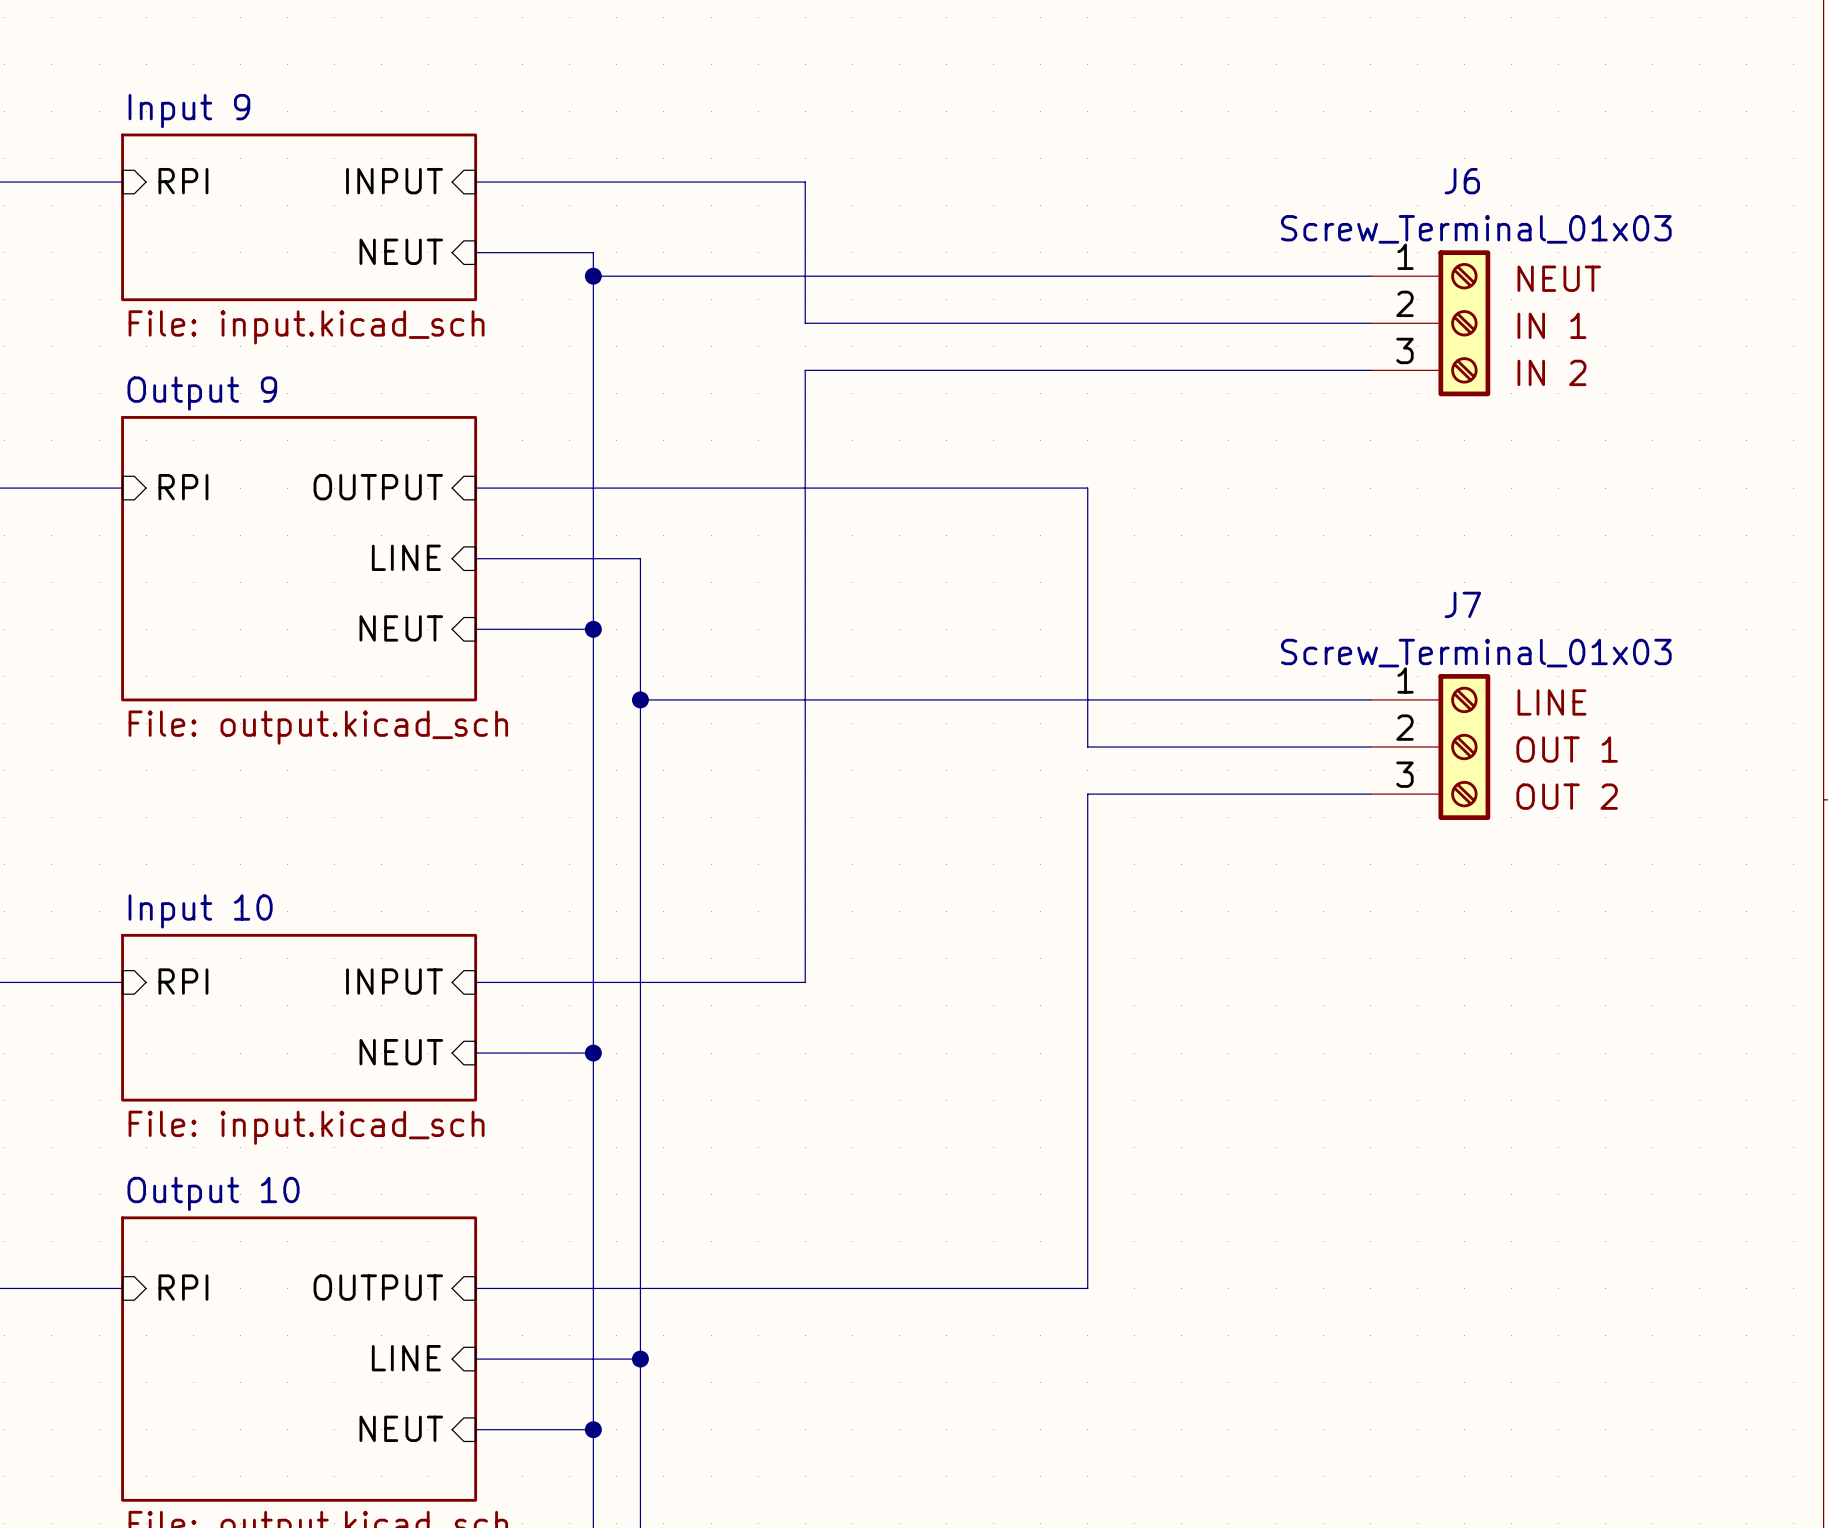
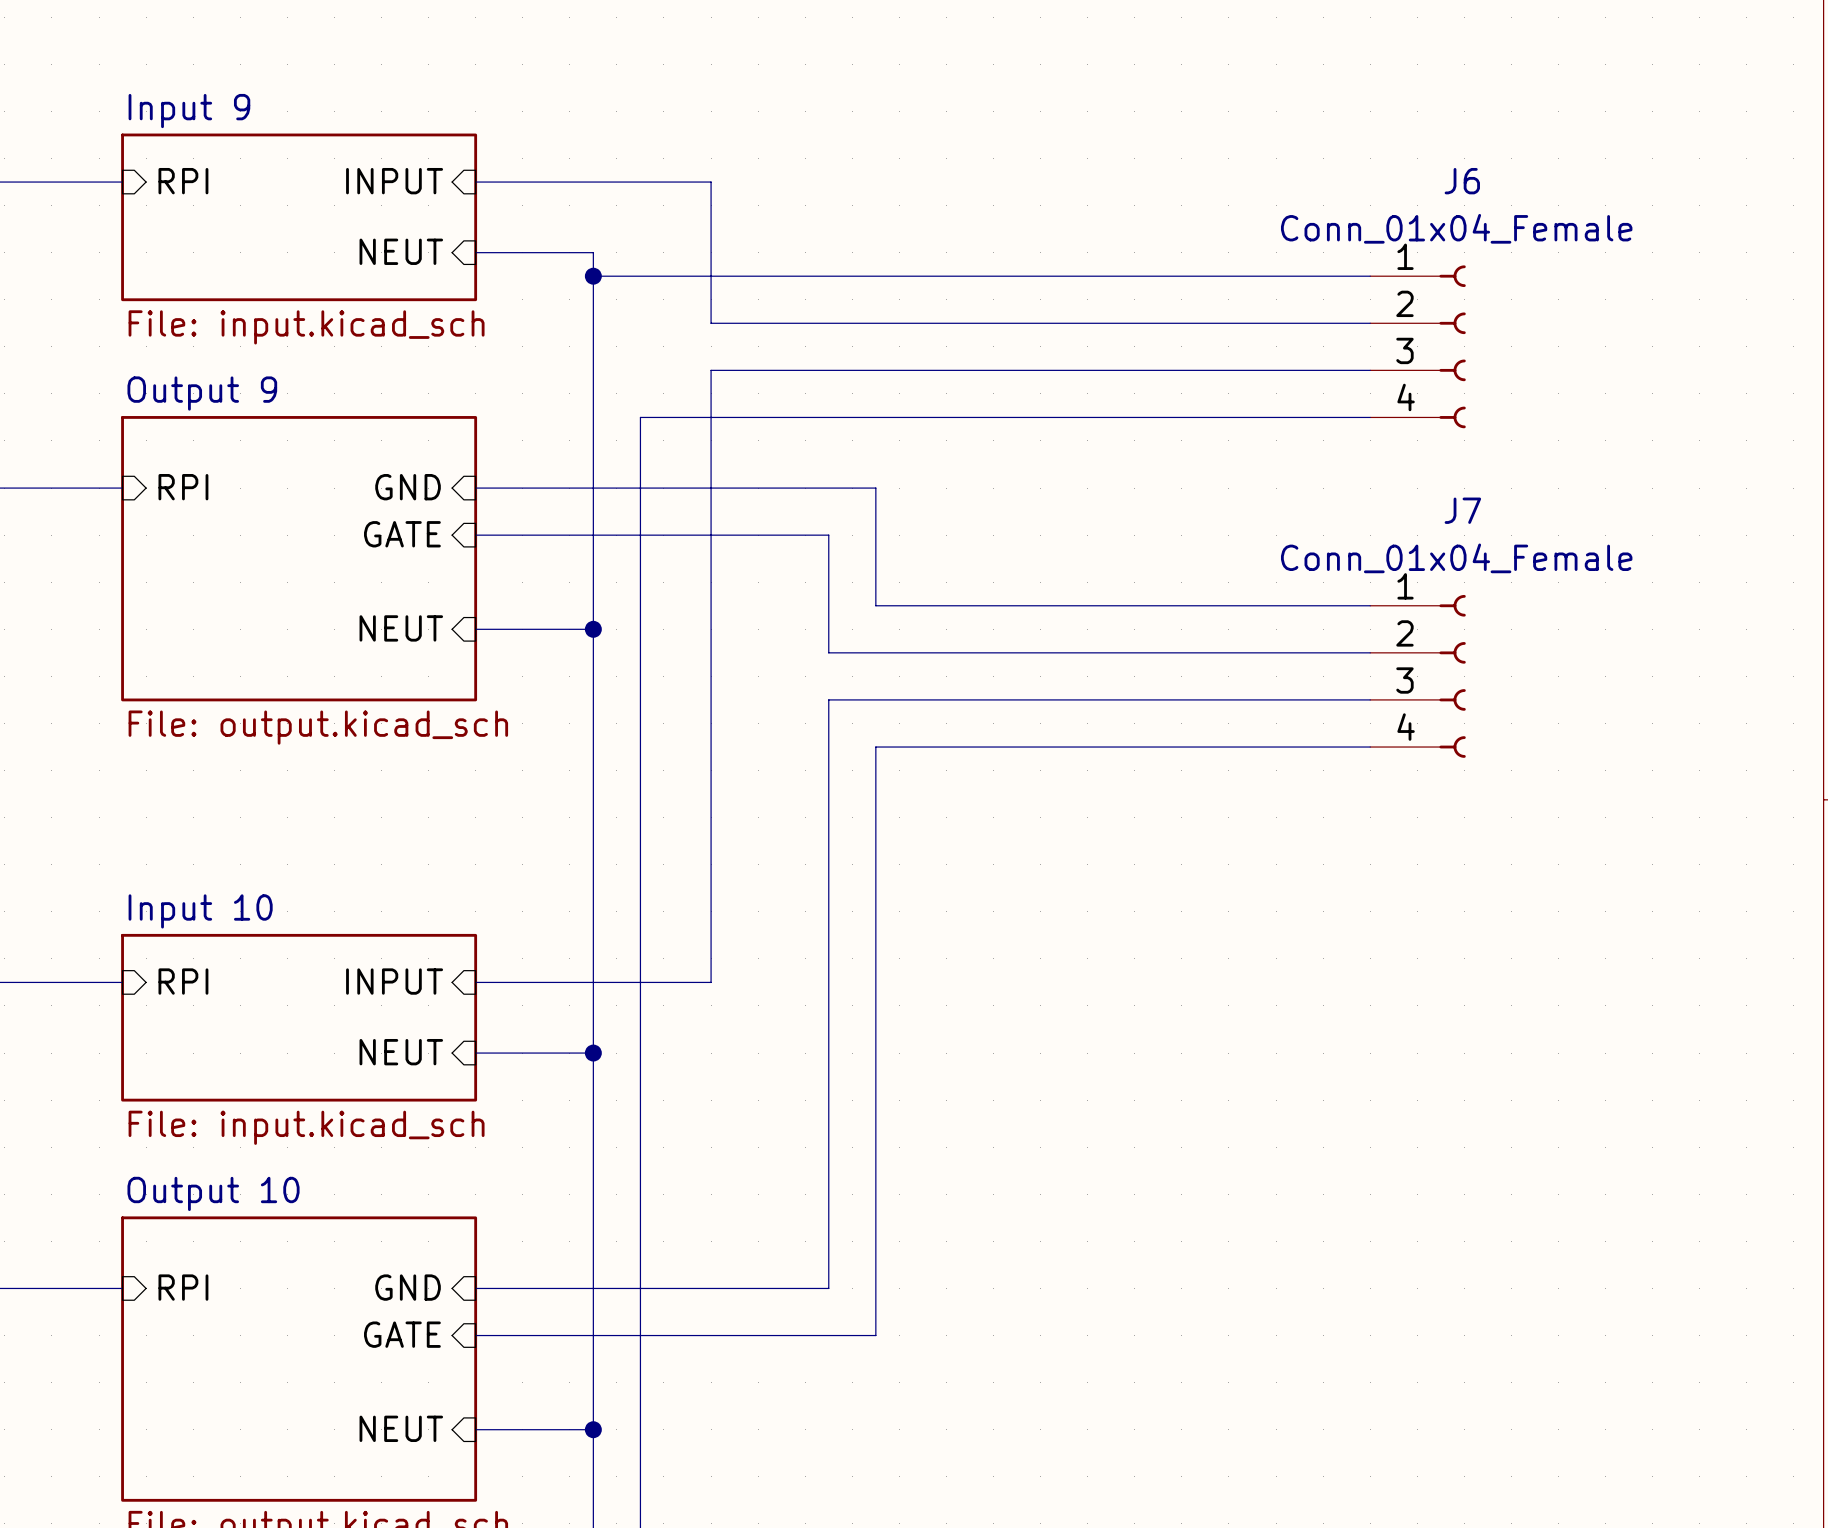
wire: (711, 182) (805, 182) (805, 323) -> (711, 182) (711, 323) (805, 323)
J6 value: Screw_Terminal_01x03 (1476, 229) -> Conn_01x04_Female (1456, 228)
J6 symbol: [1370, 250, 1491, 397] -> [1370, 265, 1466, 429]
label: NEUT (1559, 278) -> none
label: IN 1 (1551, 325) -> none
wire: (805, 370) (805, 982) (711, 982) -> (805, 370) (711, 370) (711, 982)
label: IN 2 (1551, 372) -> none
sheet pin: OUTPUT (378, 487) -> GND (408, 487)
wire: (875, 488) (1087, 488) (1087, 747) -> (875, 488) (875, 605) (1370, 605)
sheet pin: none -> GATE (402, 534)
wire: none -> (475, 535) (828, 535) (828, 652) (1370, 652)
sheet pin: LINE (406, 557) -> none
wire: (475, 558) (640, 558) -> (1370, 417) (640, 417) (640, 558)
J7 value: Screw_Terminal_01x03 (1476, 653) -> Conn_01x04_Female (1456, 558)
J7 symbol: [1370, 674, 1491, 820] -> [1370, 594, 1466, 758]
wire: (640, 699) (828, 699) -> none
junction: (640, 699) -> none
label: LINE (1551, 702) -> none
wire: none -> (1087, 747) (875, 747) (875, 1335) (475, 1335)
label: OUT 1 (1567, 749) -> none
wire: (1370, 794) (1087, 794) (1087, 1288) (828, 1288) -> (828, 699) (828, 1288)
label: OUT 2 (1567, 796) -> none
sheet pin: OUTPUT (378, 1287) -> GND (408, 1287)
sheet pin: none -> GATE (402, 1334)
sheet pin: LINE (406, 1358) -> none
wire: (475, 1359) (640, 1359) -> none
junction: (640, 1359) -> none

